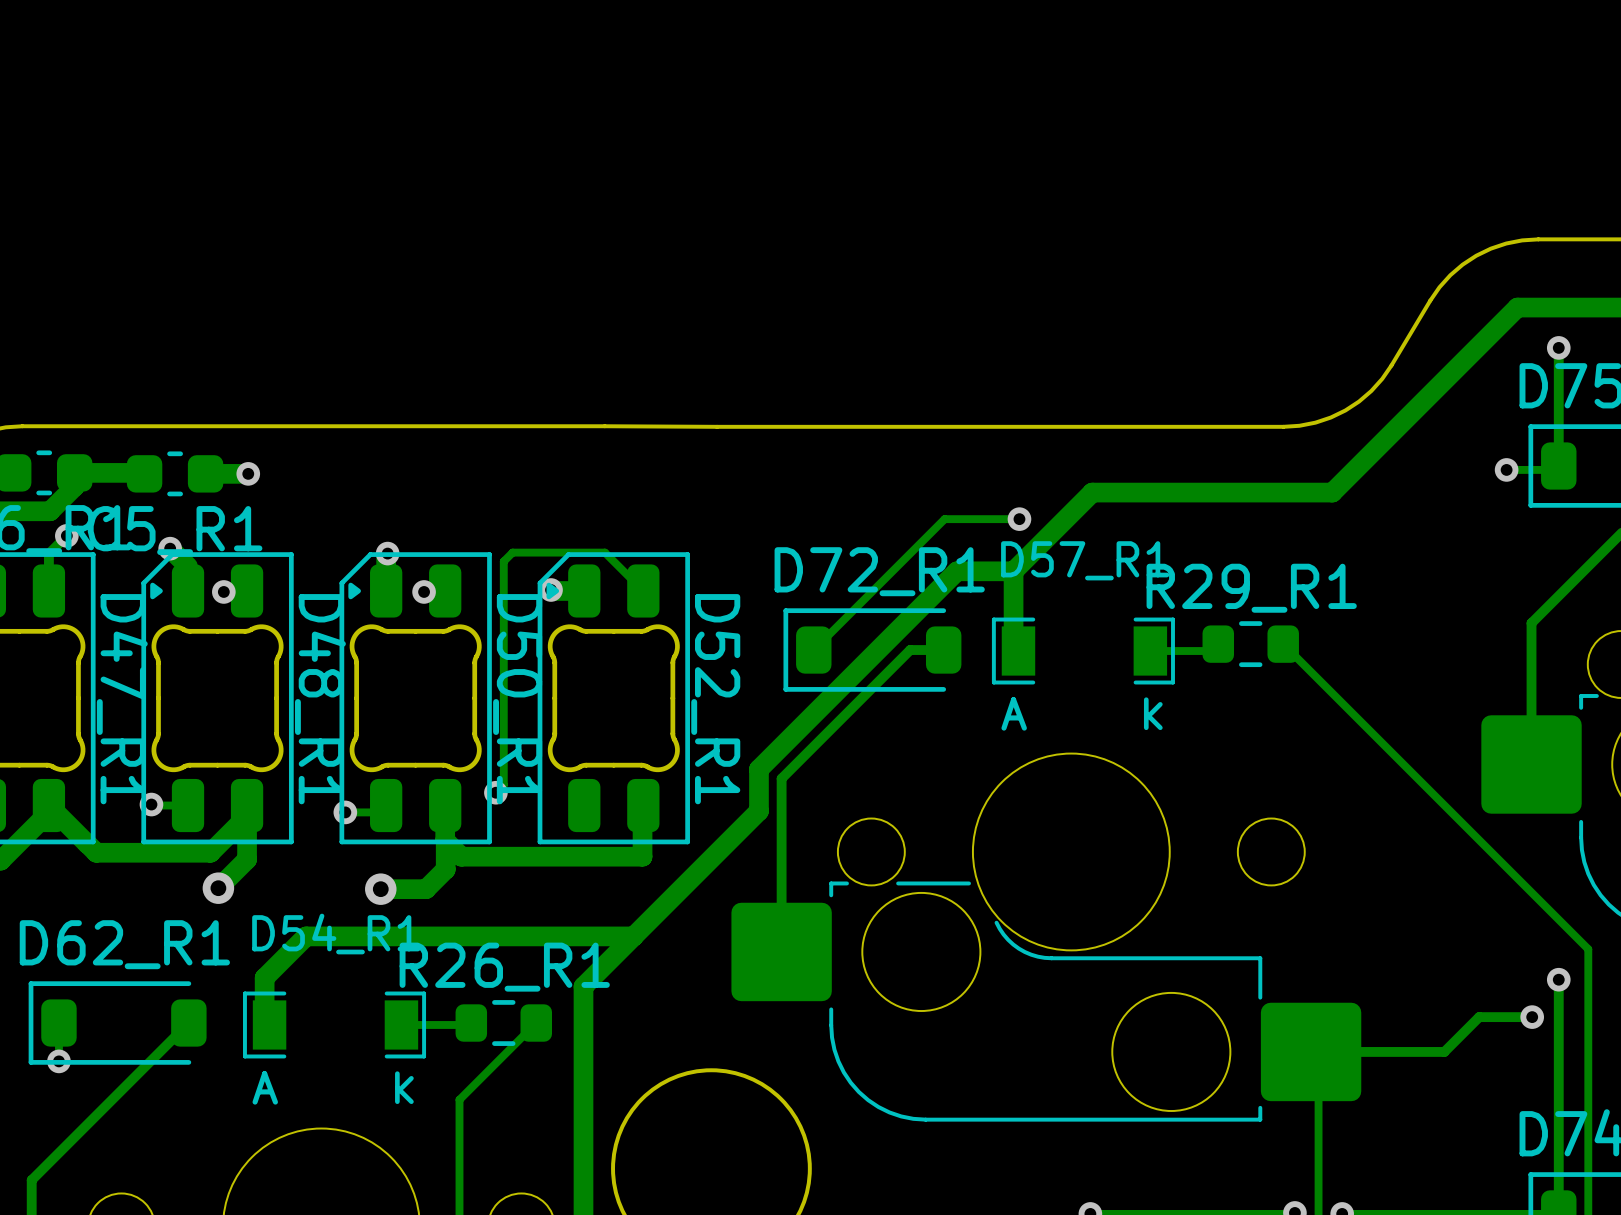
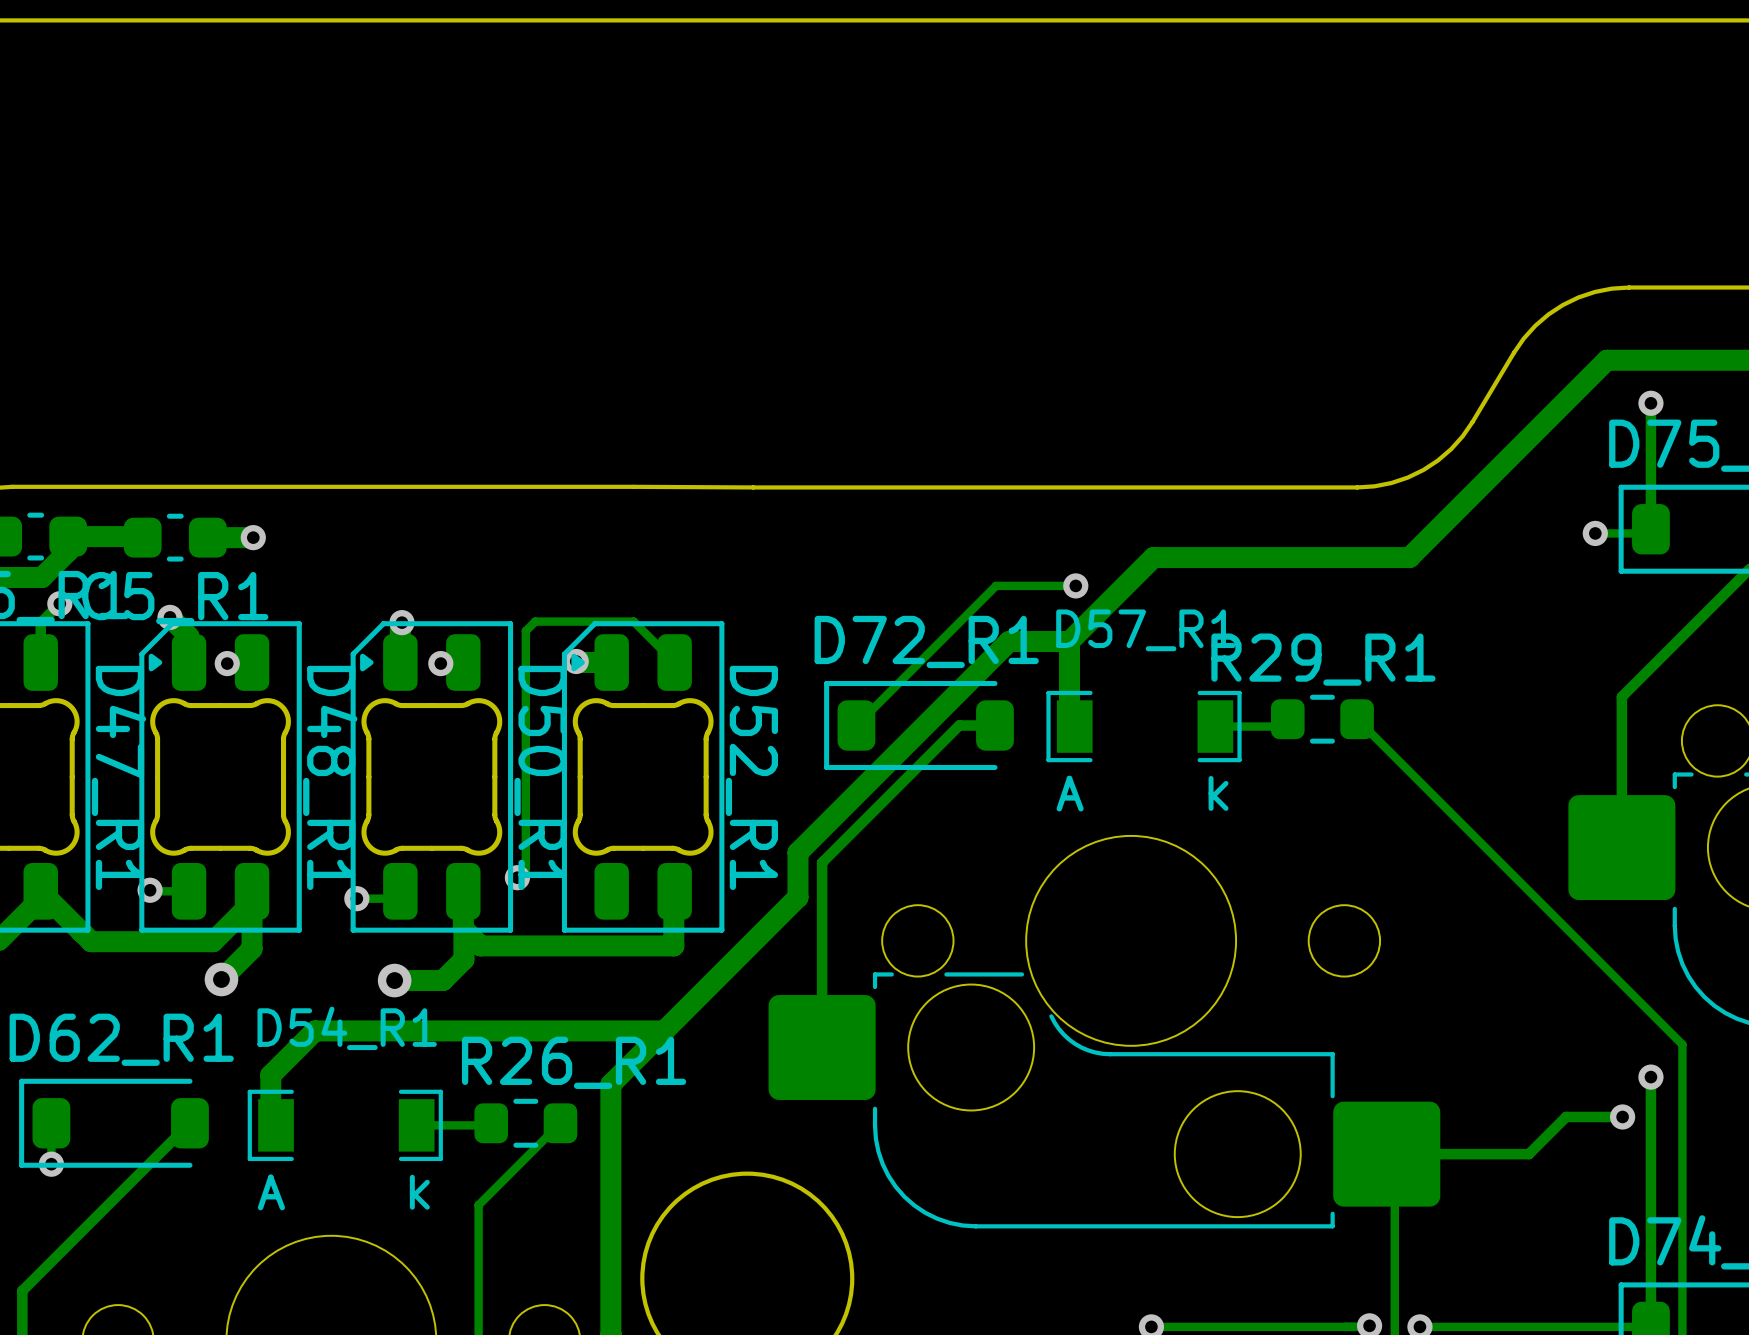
R26_R1 name position: R26_R1 (504, 967) -> R26_R1 (574, 1062)

